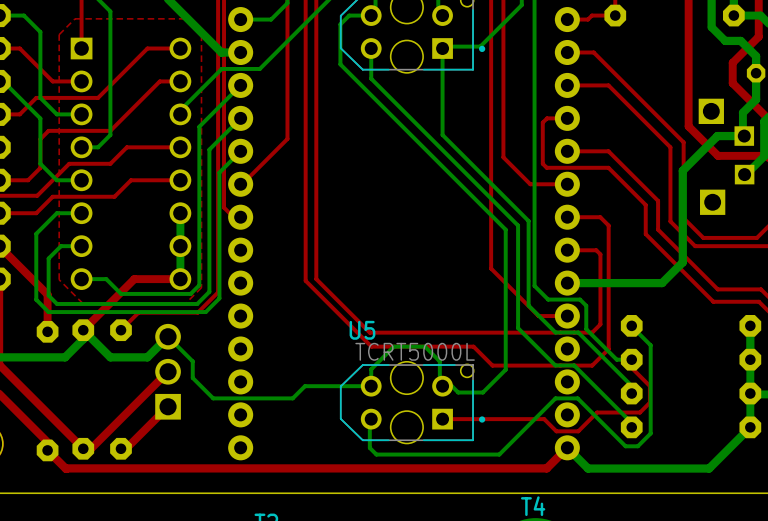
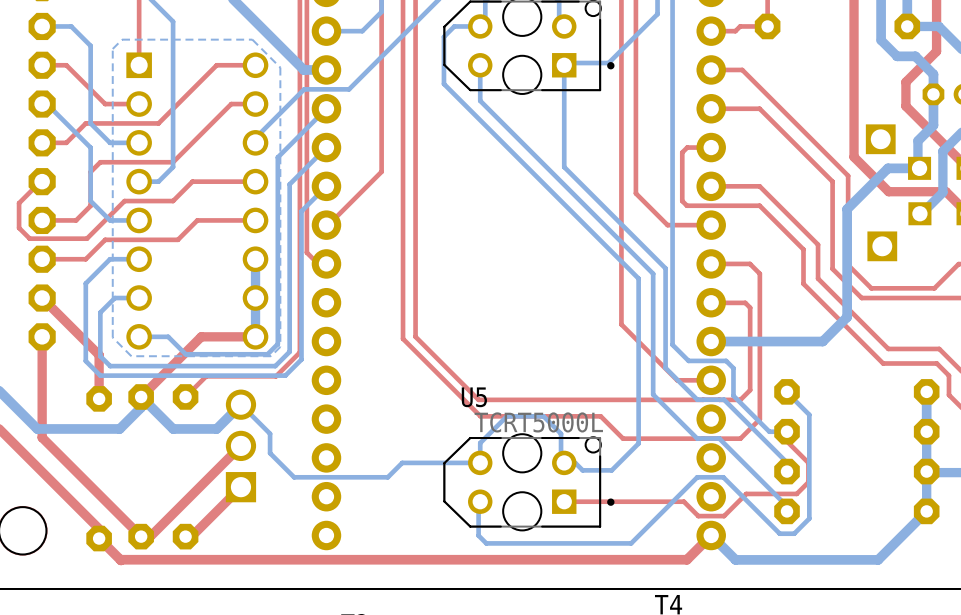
top zone outline: (185, 18) (201, 34) (201, 287) (185, 303) (82, 303) (59, 279) (59, 34) (74, 18) (185, 18) -> none
bottom zone outline: none -> (252, 39) (280, 67) (280, 346) (271, 356) (131, 356) (112, 337) (112, 48) (122, 39) (252, 39)

